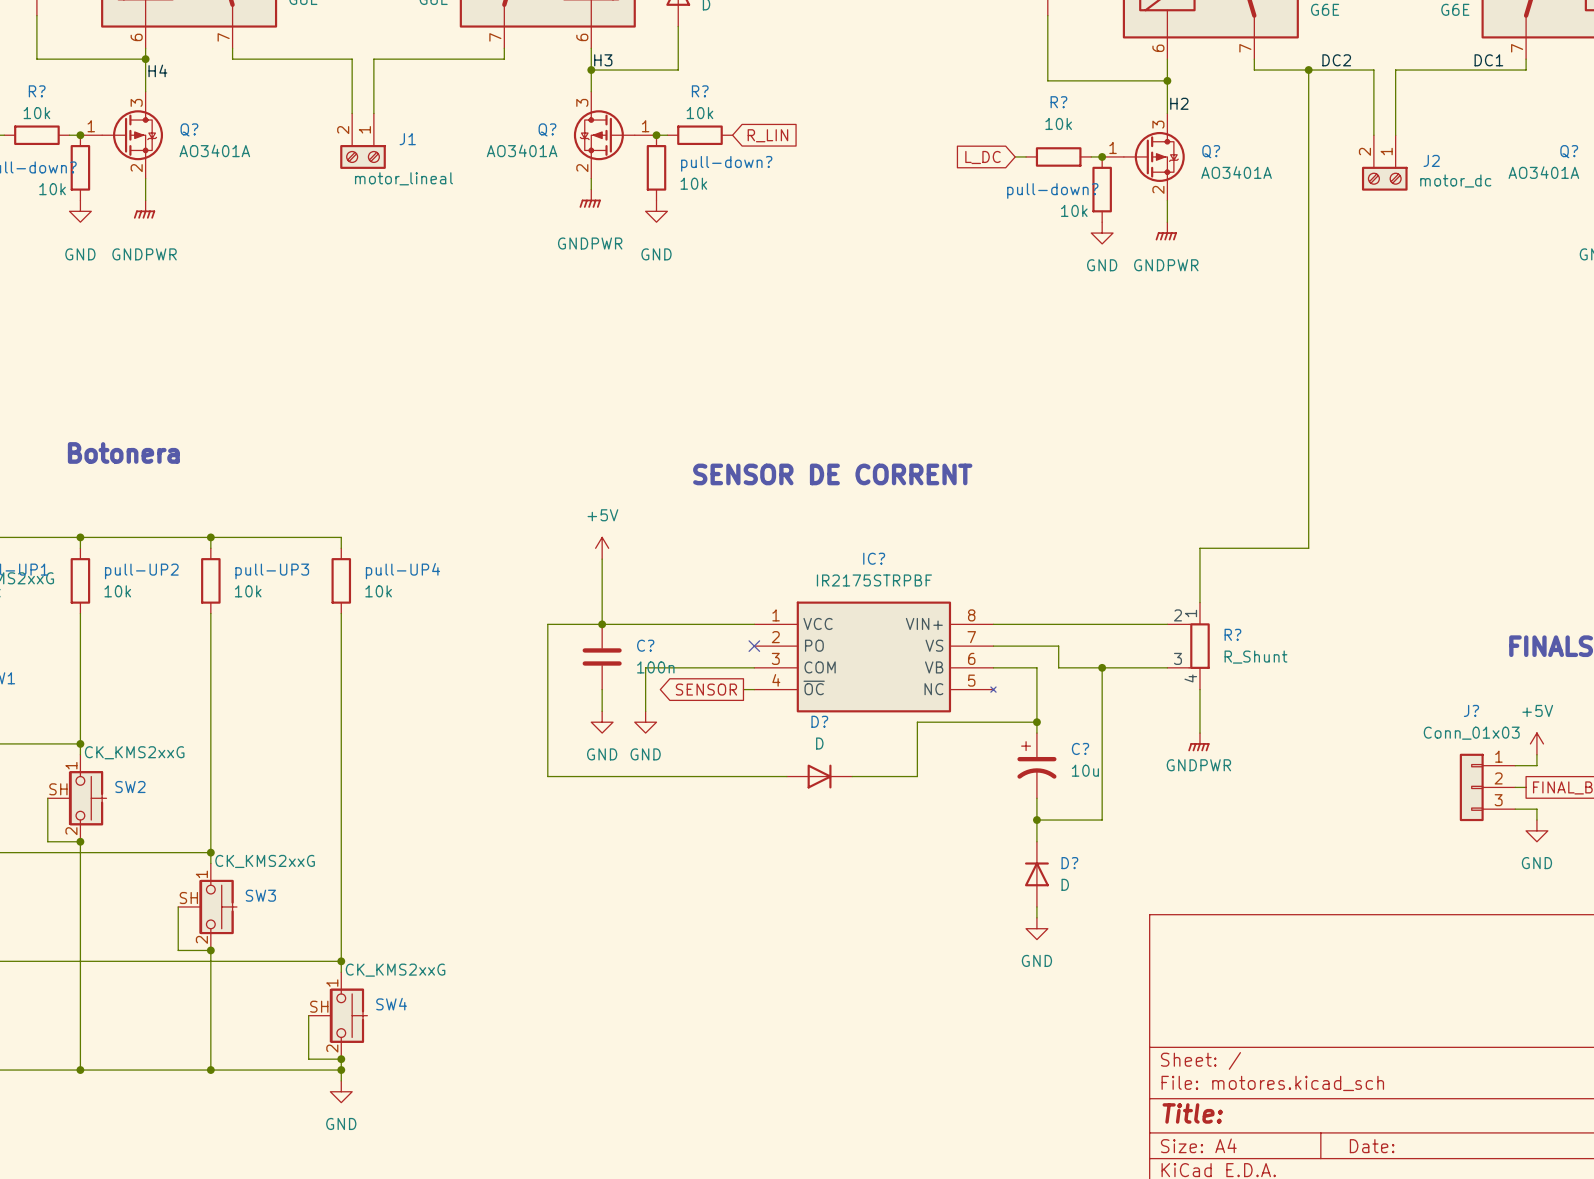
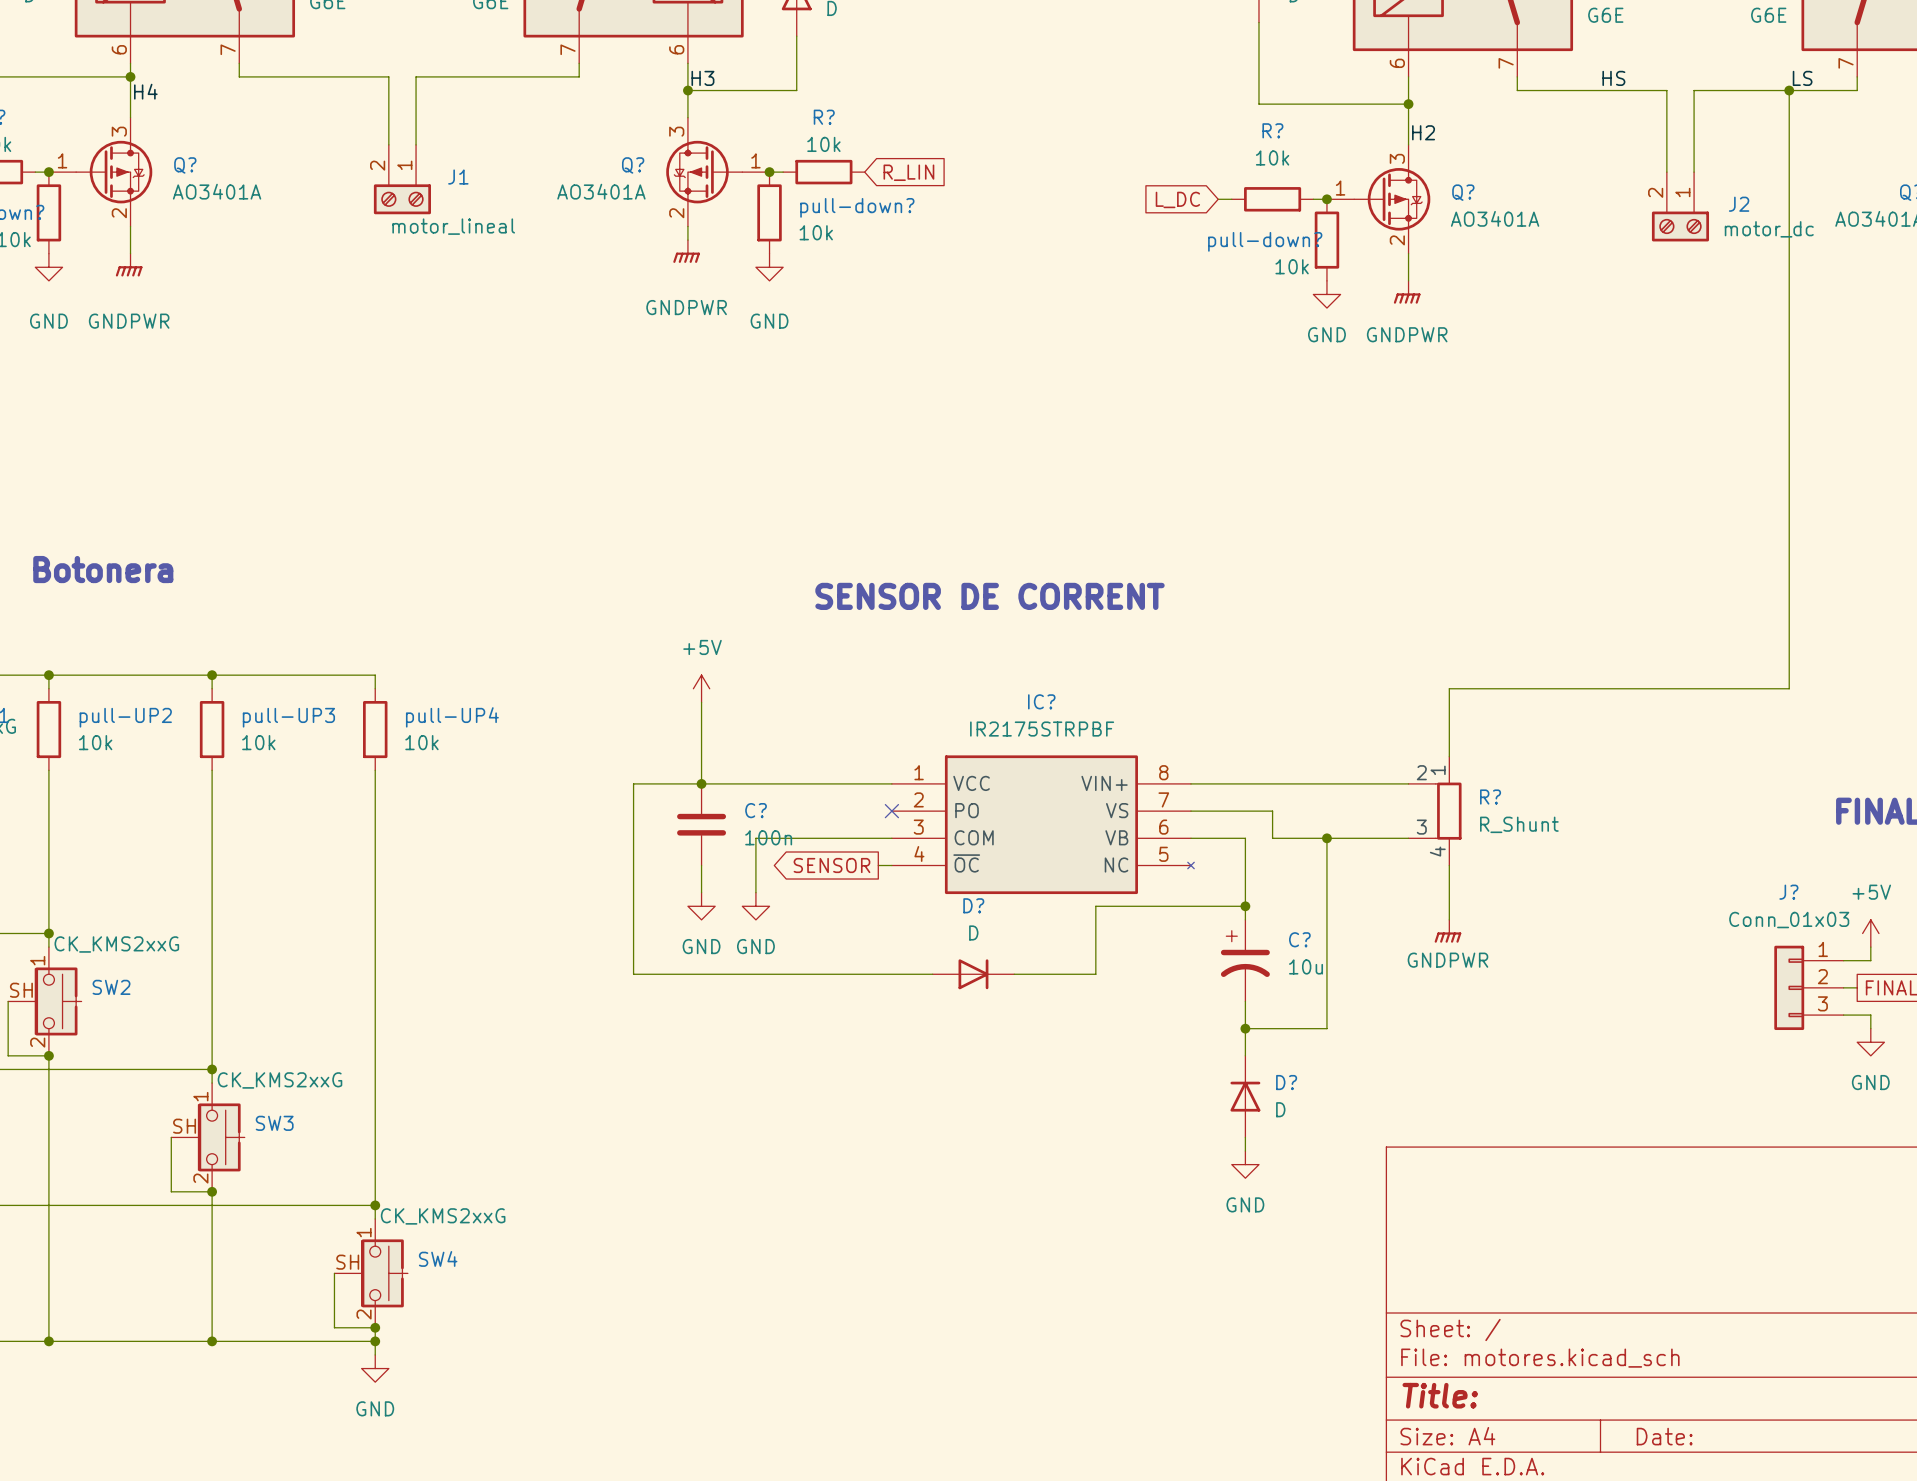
label: DC2 (1336, 60) -> HS (1613, 78)
label: DC1 (1488, 60) -> LS (1802, 78)
wire: (1308, 70) (1308, 548) -> (1789, 90) (1789, 688) (1585, 688)
junction: (1308, 70) -> none
junction: none -> (1789, 90)

